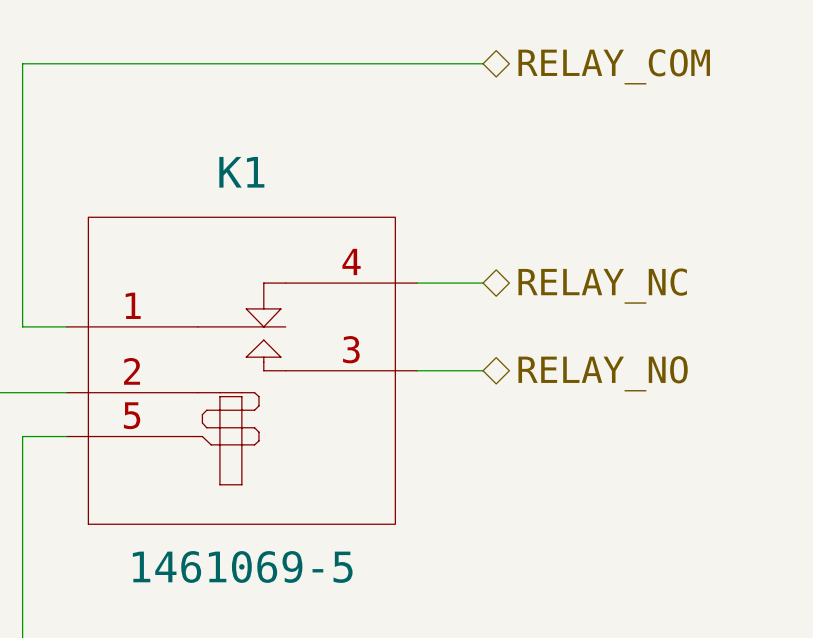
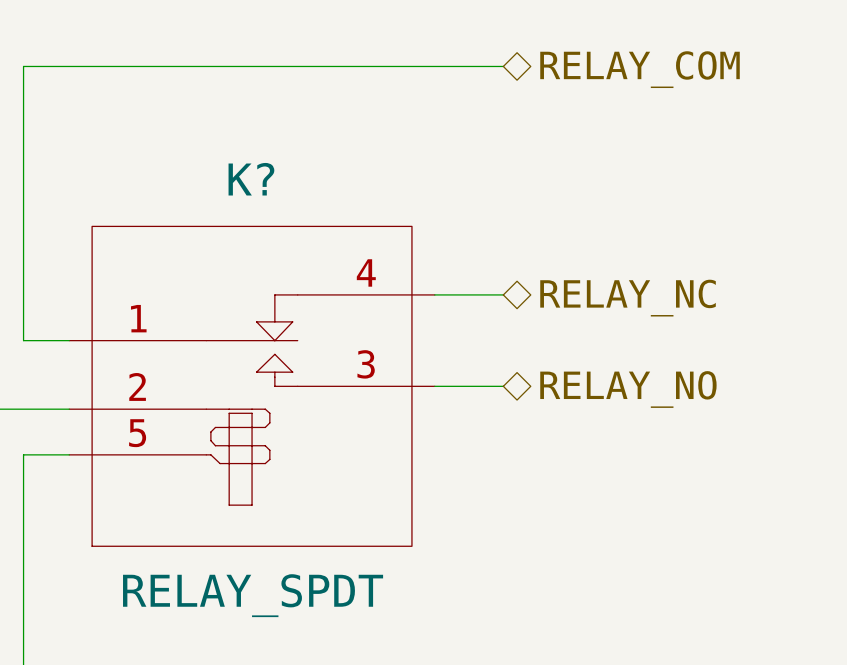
K1 name: K1 (241, 172) -> K? (251, 179)
K1 value: 1461069-5 (242, 566) -> RELAY_SPDT (253, 595)

